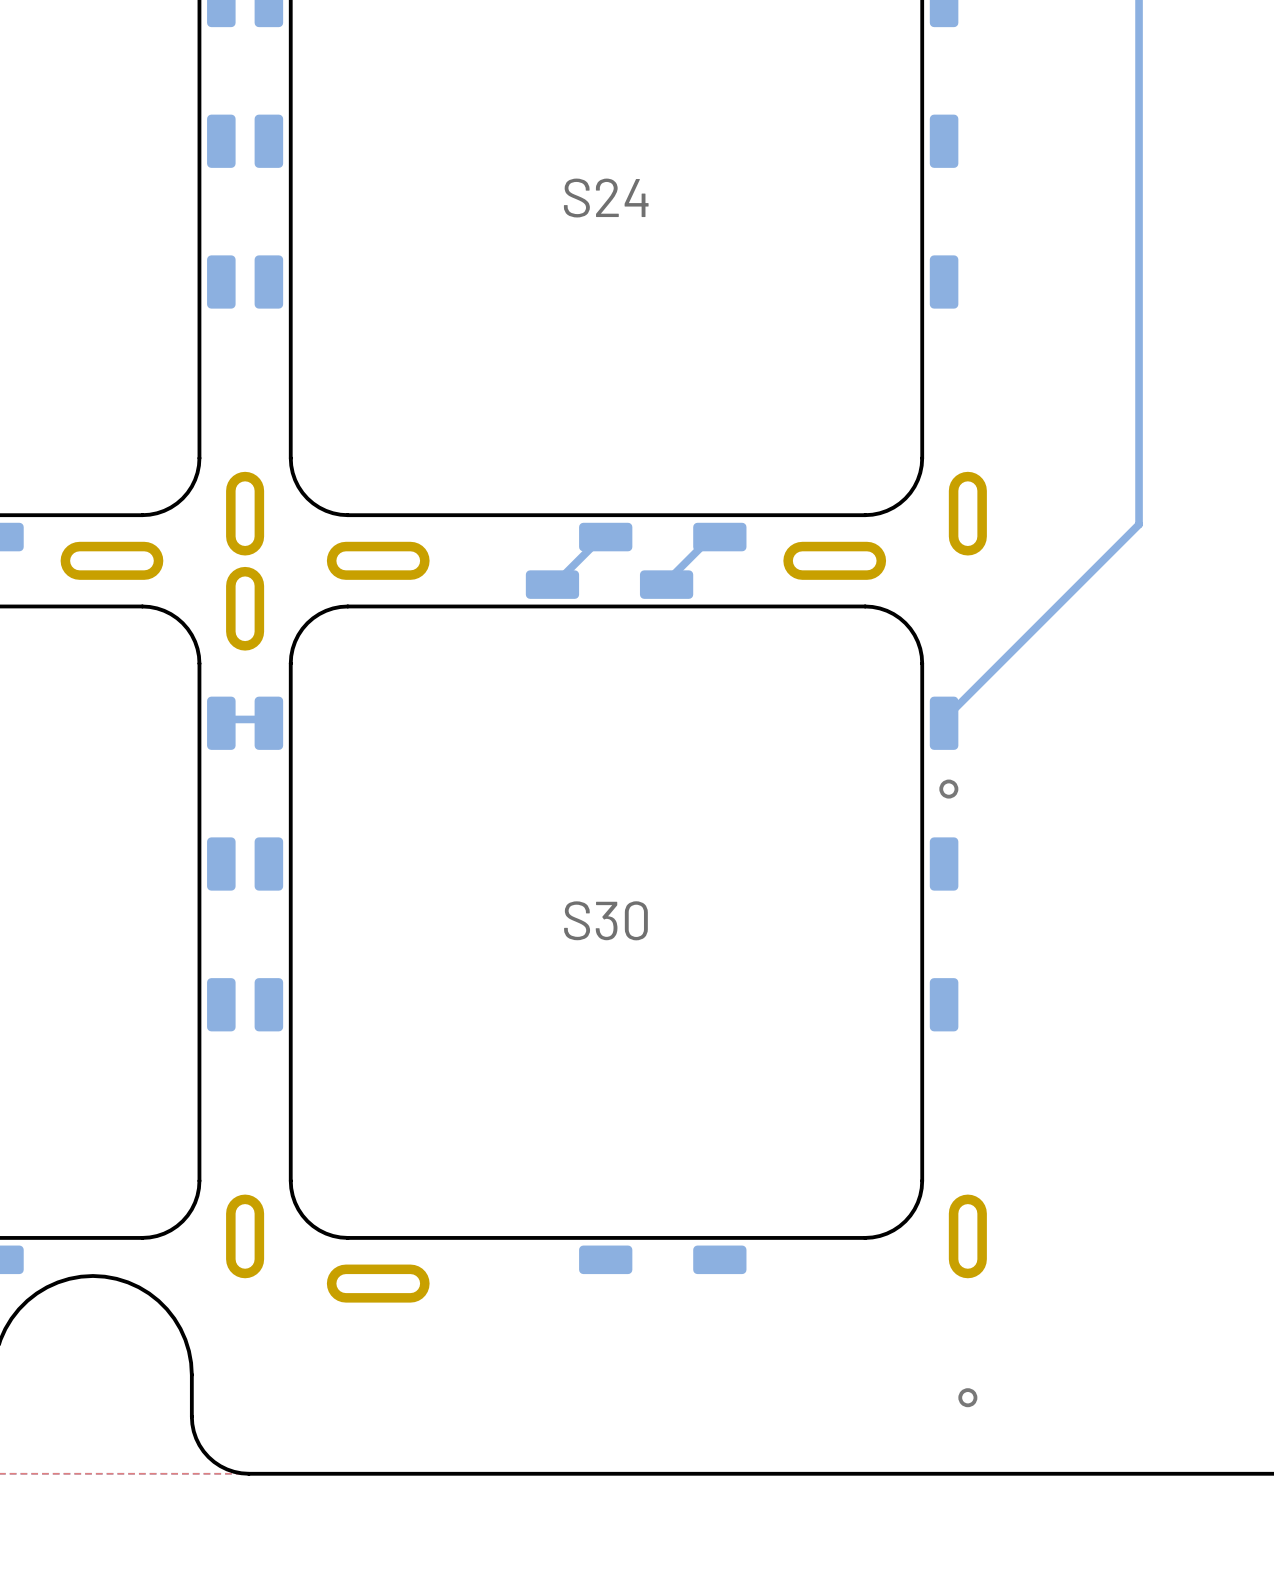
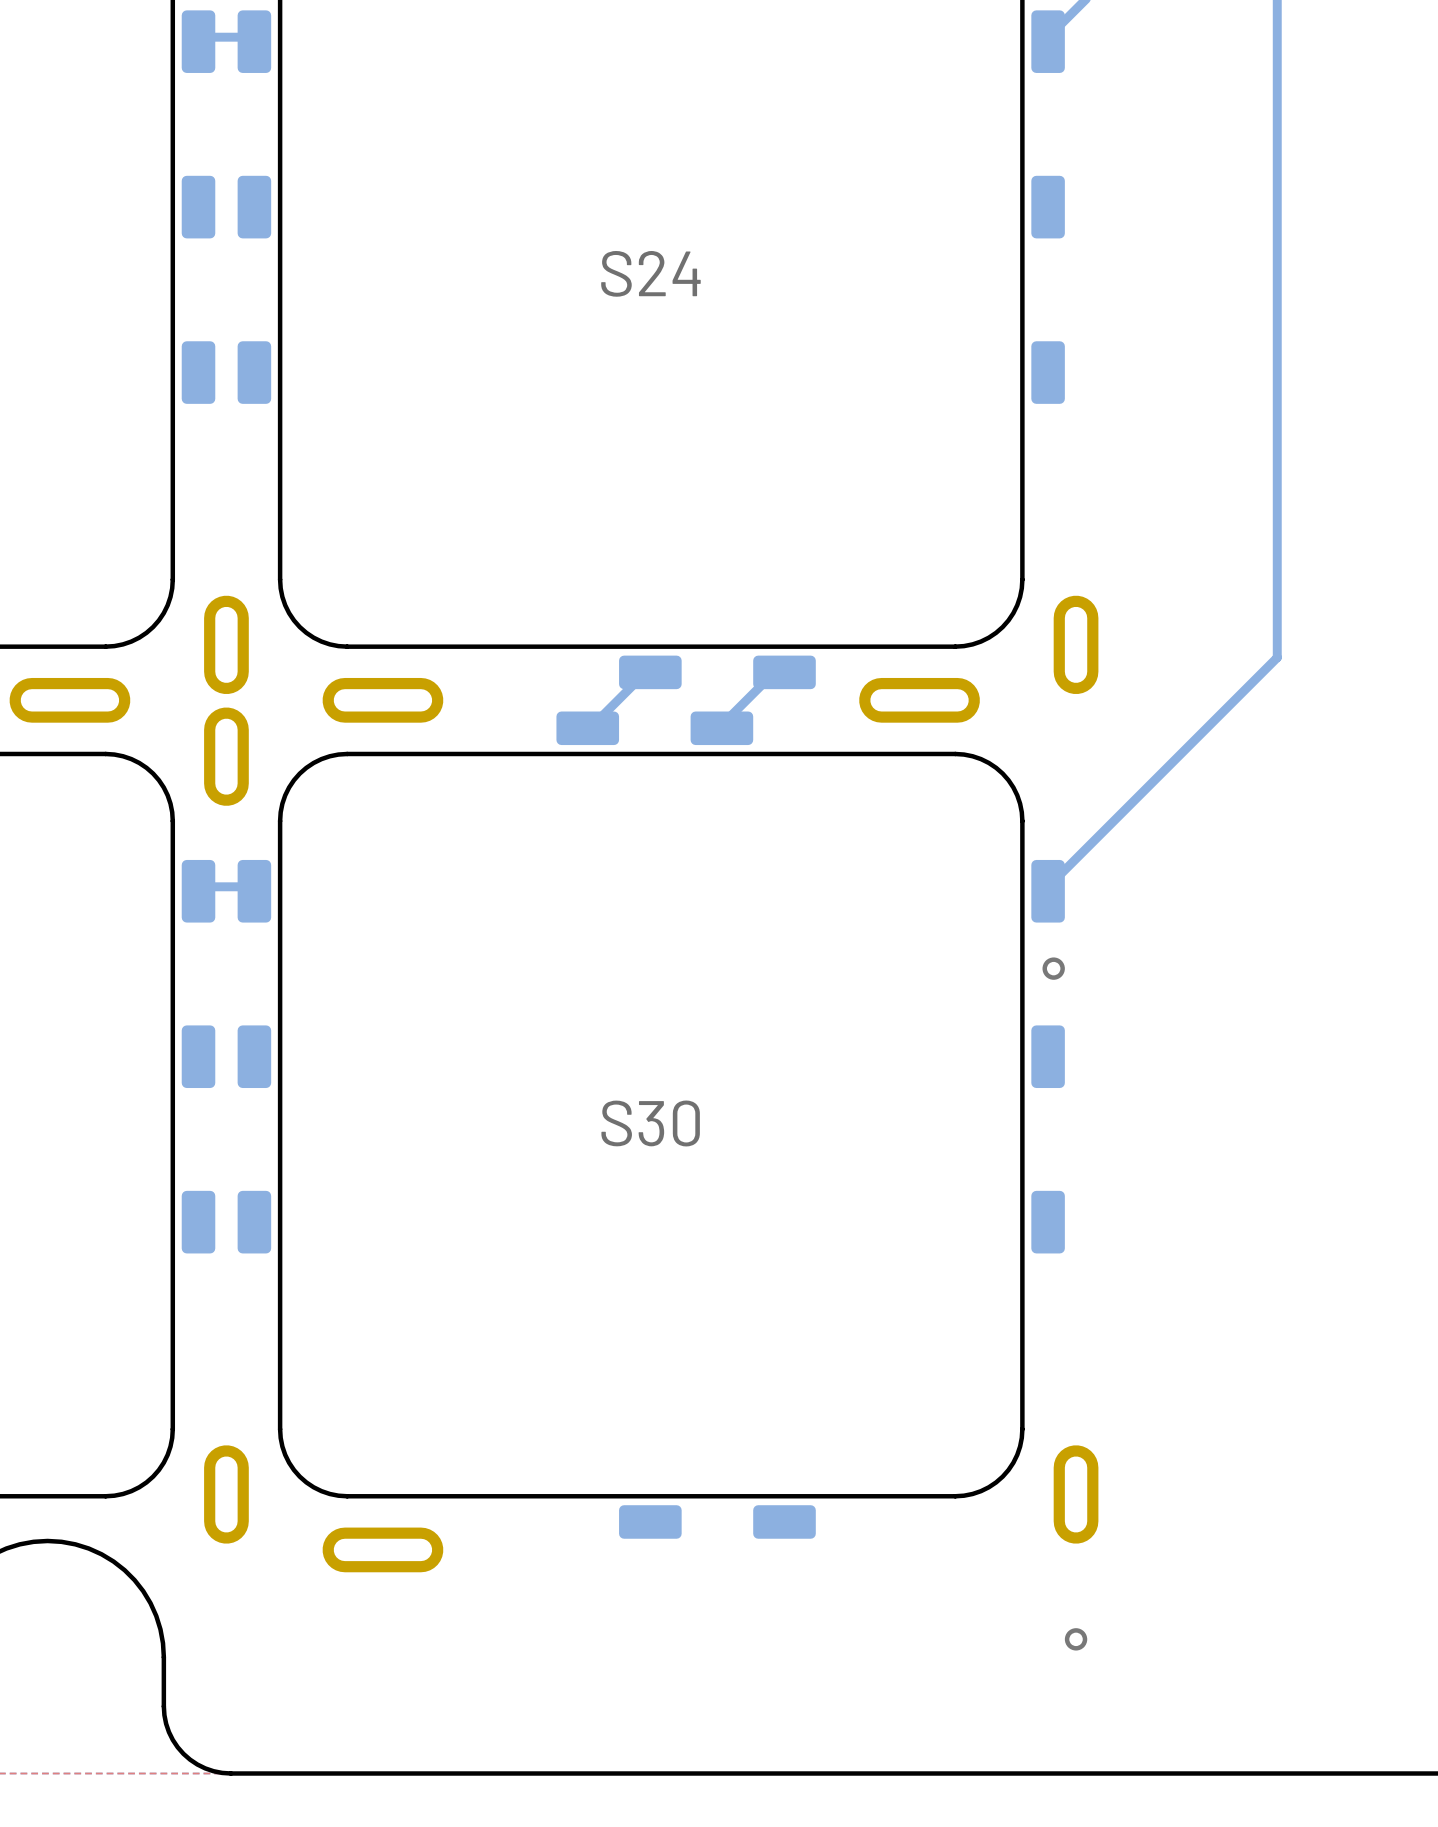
via position: (967, 1397) -> (1076, 1639)

